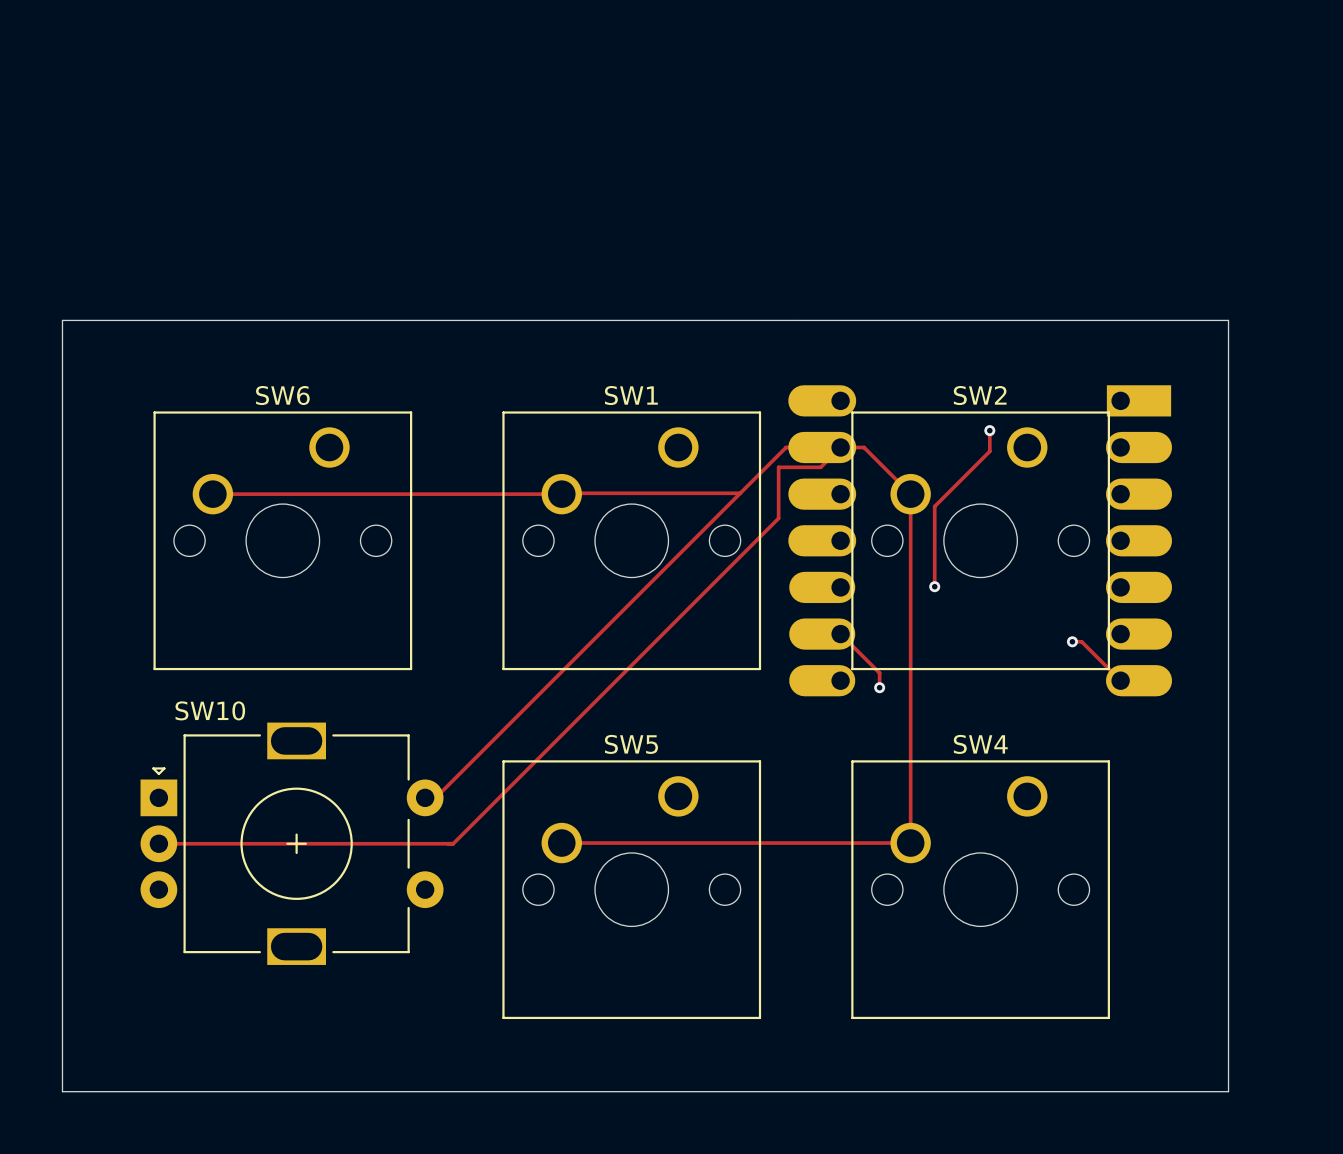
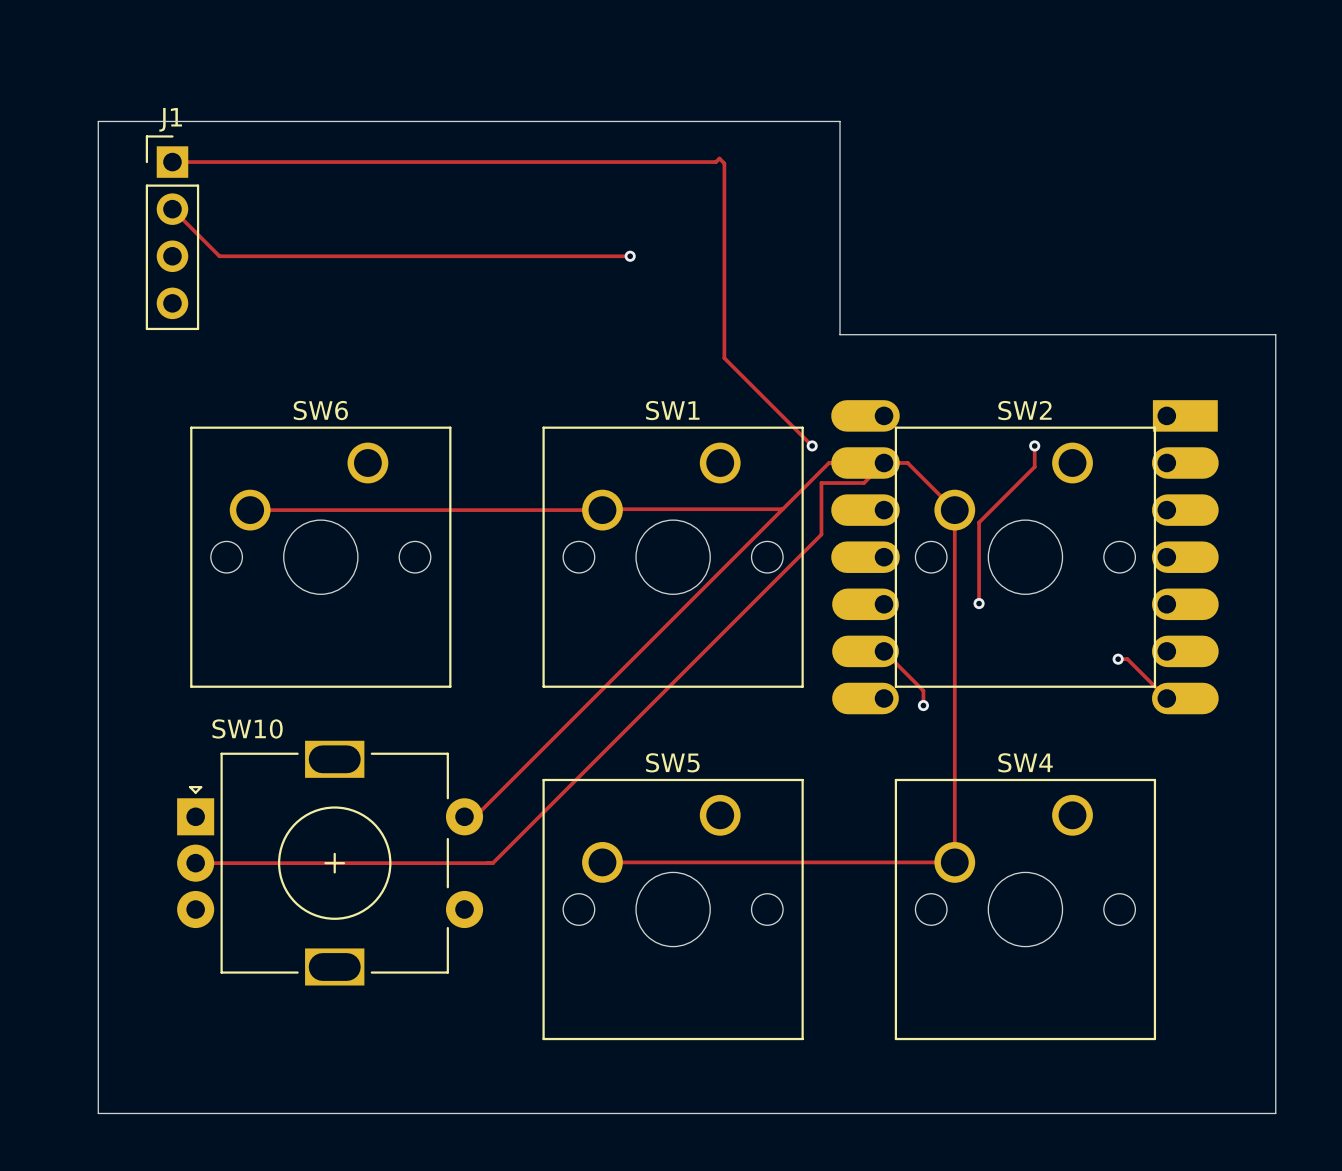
track: none -> (172, 162) (715, 162) (719, 158) (724, 163) (724, 358) (812, 445)
track: none -> (172, 209) (219, 256) (630, 256)
J1: none -> (172, 232)
via: none -> (630, 256)
board edge: (62, 320) (797, 320) -> (98, 334) (98, 121) (840, 121) (840, 334)
via: none -> (812, 445)

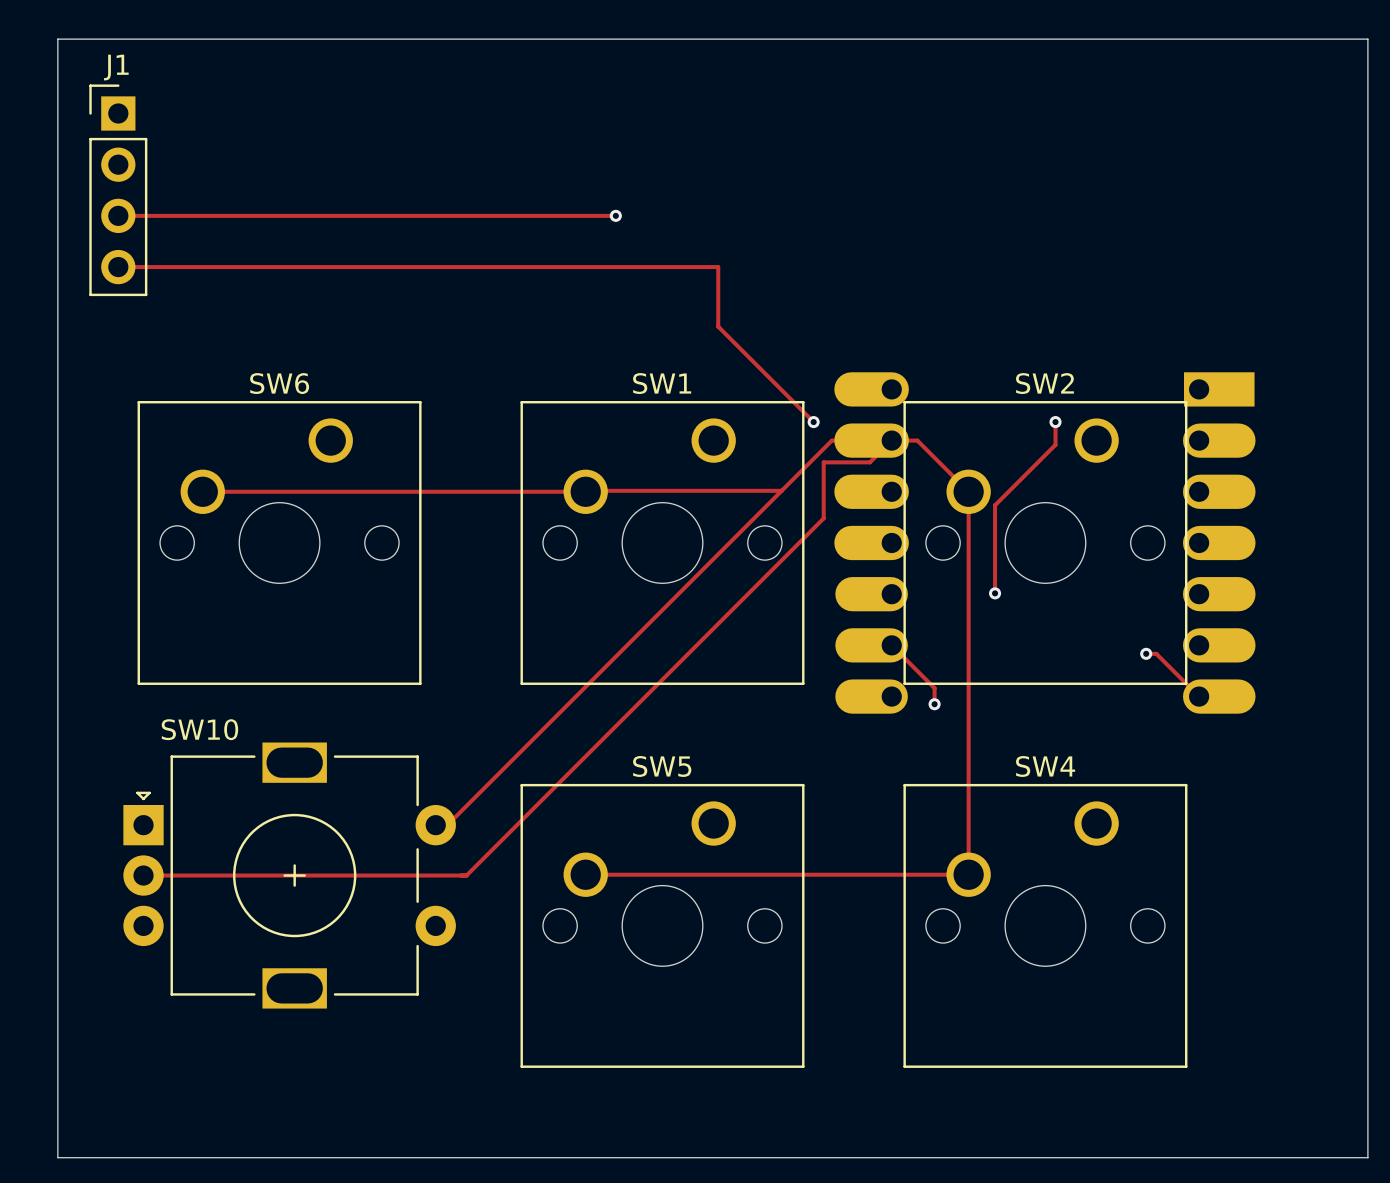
board edge: (98, 121) (98, 1113) (1275, 1113) (1275, 334) (840, 334) (840, 121) (98, 121) -> (57, 39) (57, 1157) (1367, 1157) (1367, 39) (57, 39)
track: (172, 162) (715, 162) (719, 158) (724, 163) (724, 303) -> (118, 267) (718, 267)
track: (172, 209) (219, 256) -> (118, 215) (169, 215)

